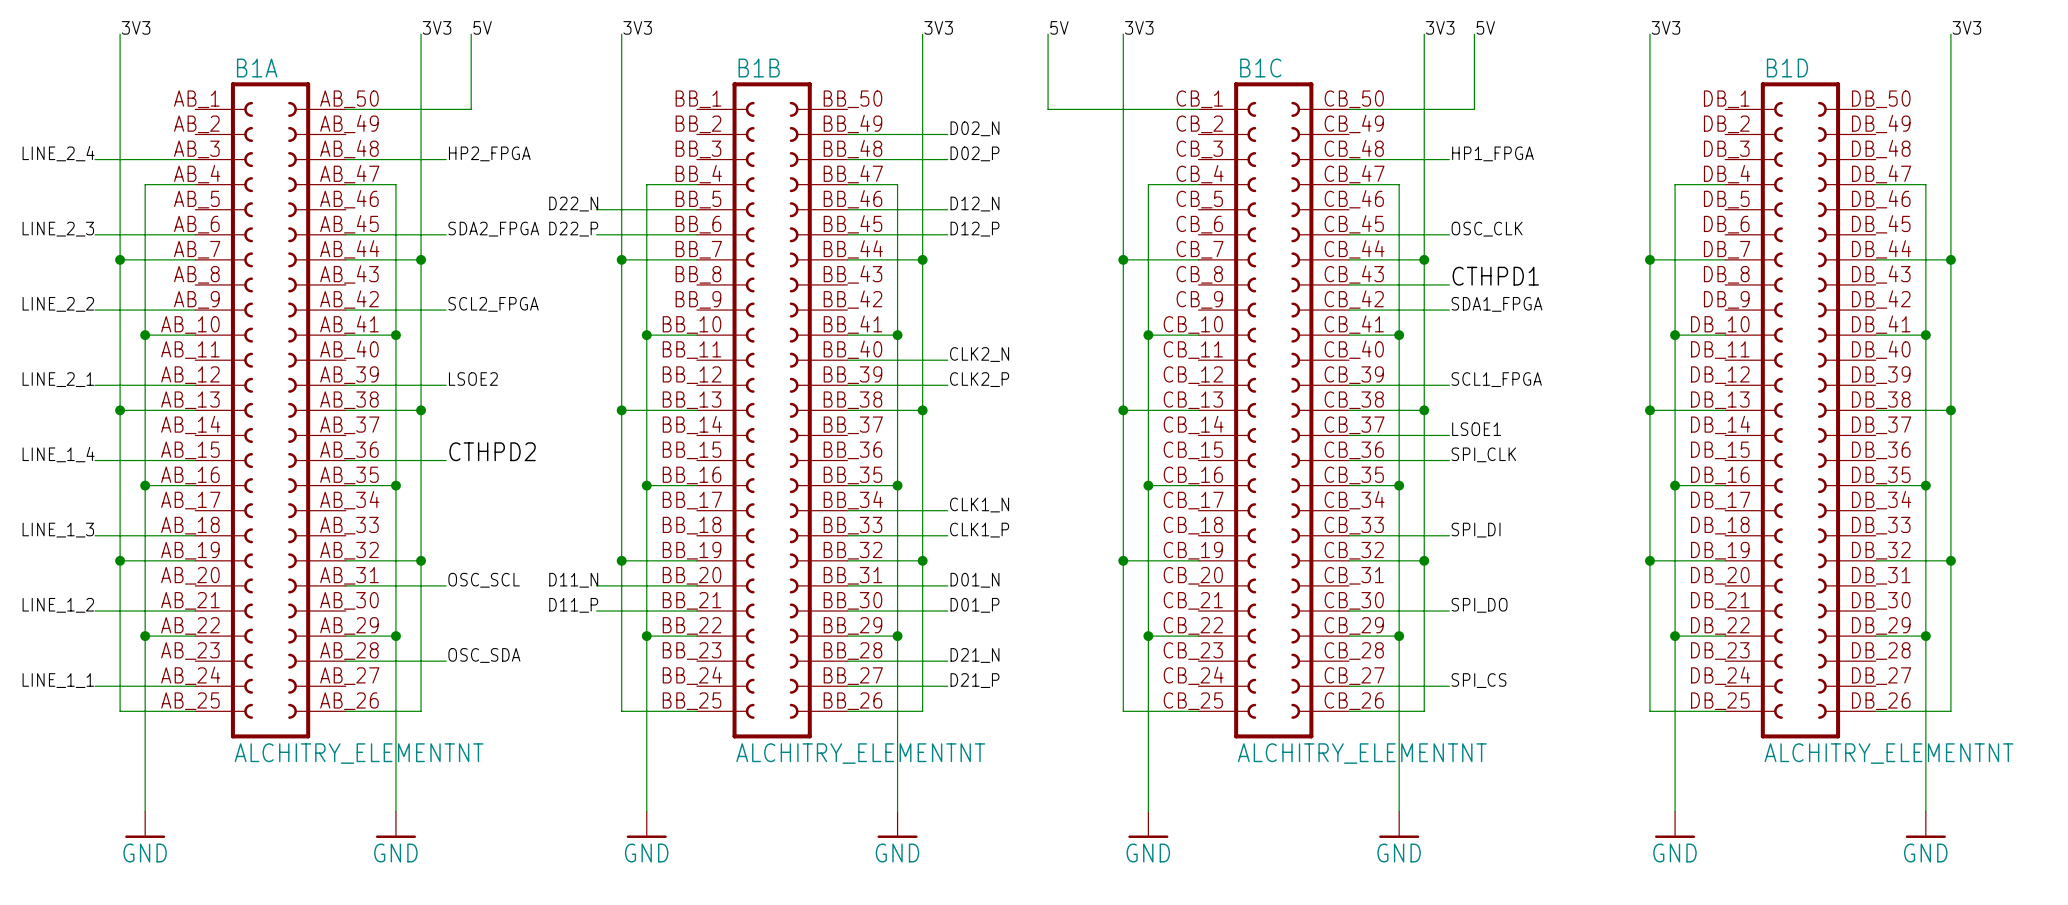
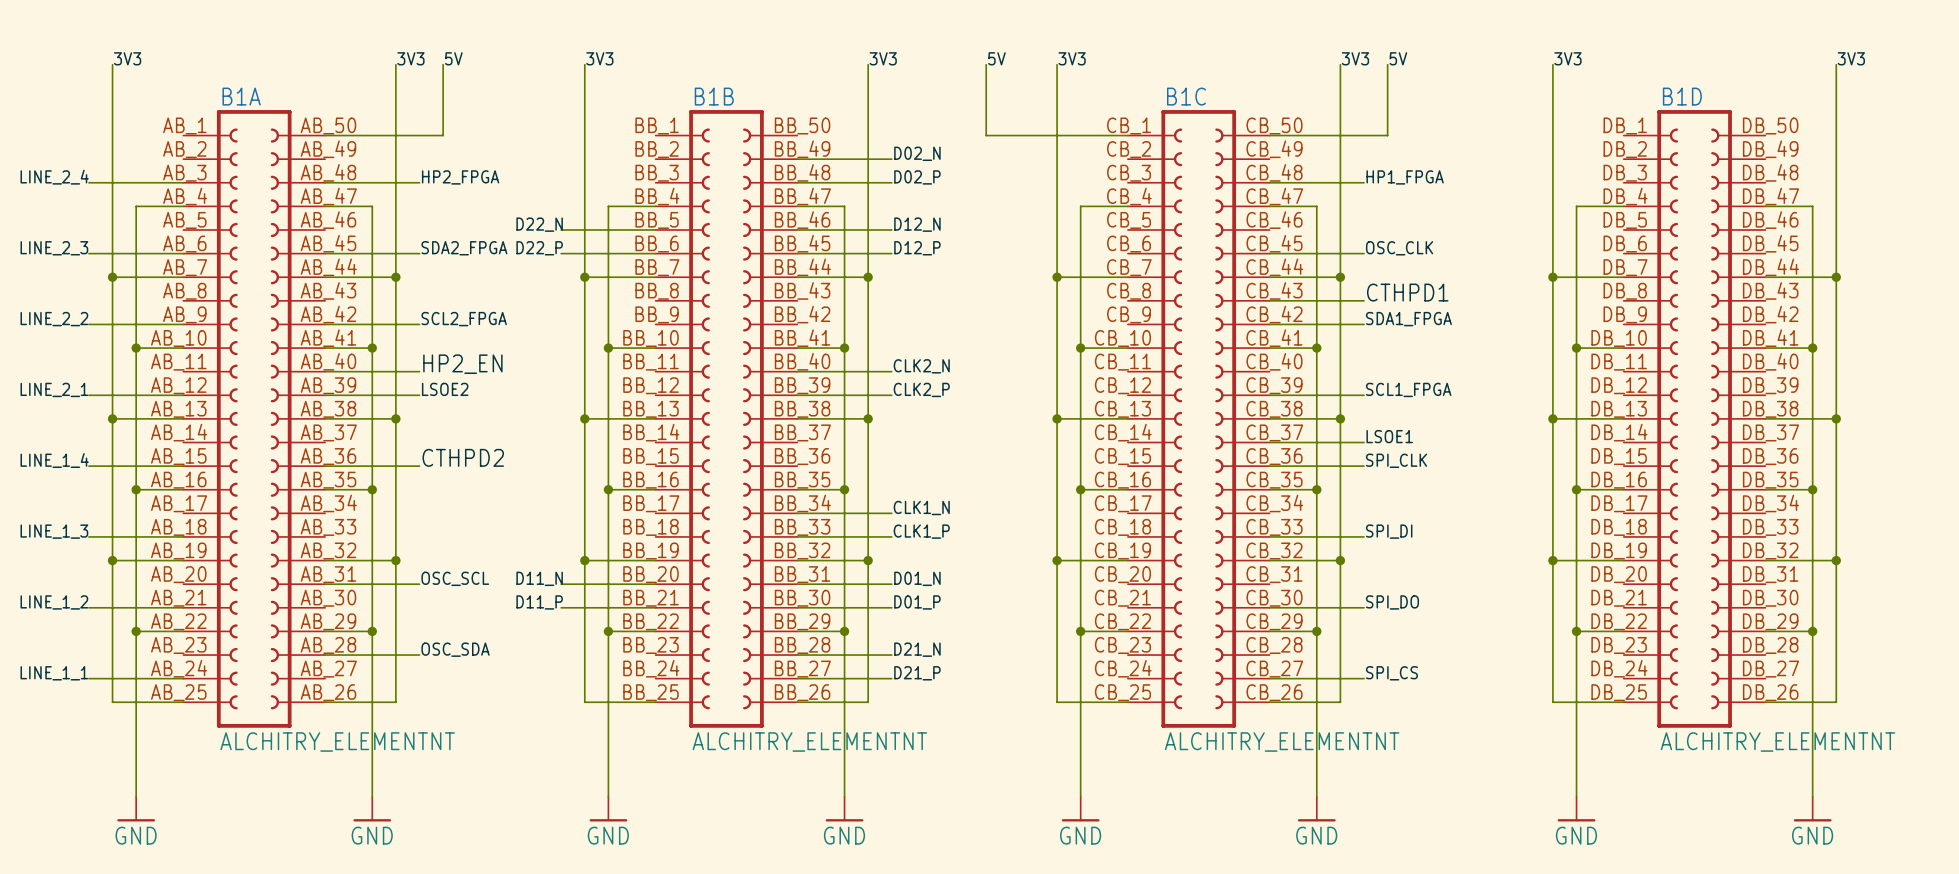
label: none -> HP2_EN (462, 364)
wire: none -> (325, 371) (419, 371)

